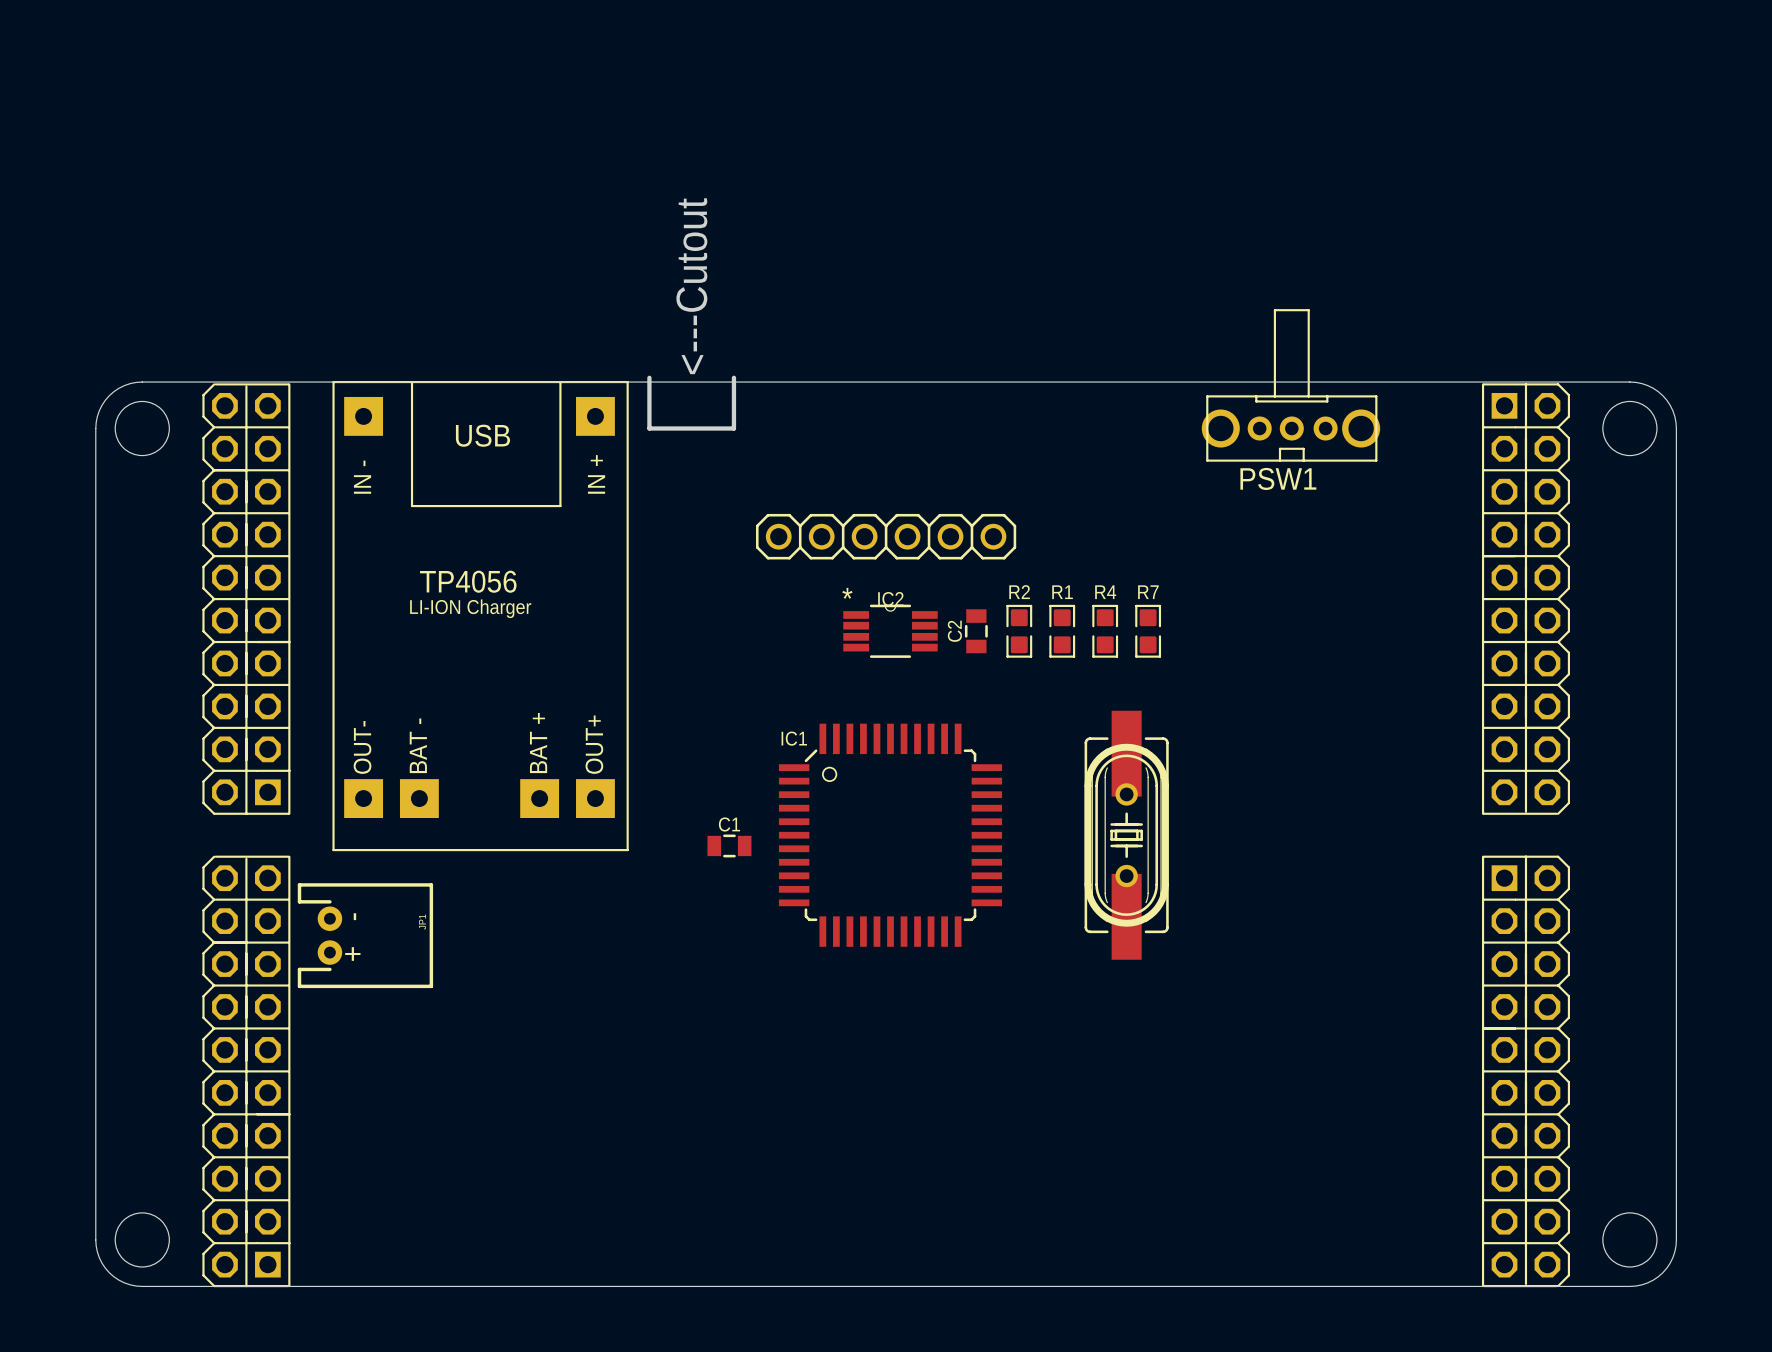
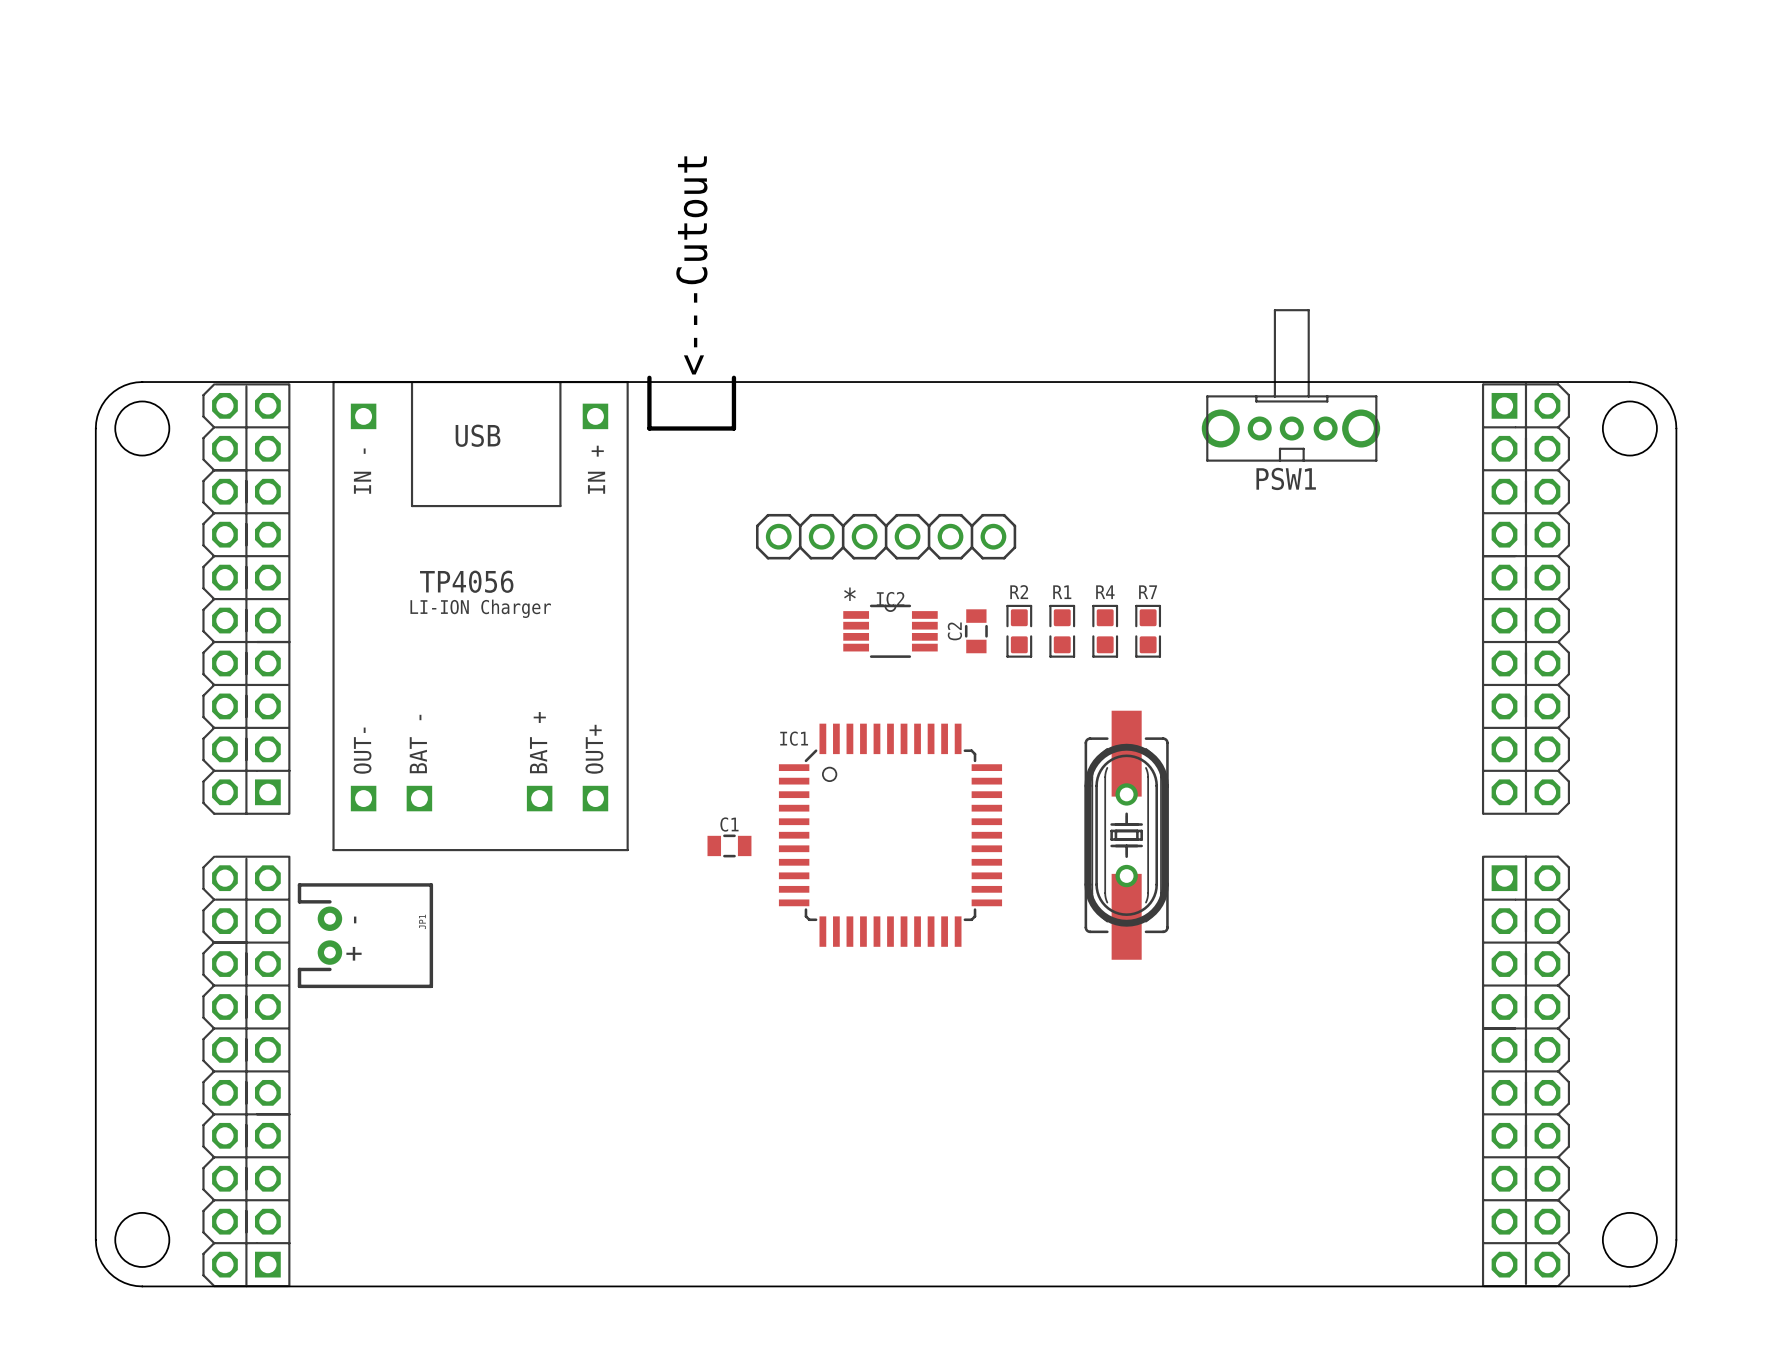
part footprint: [332, 380, 629, 852] -> [332, 380, 629, 852]

